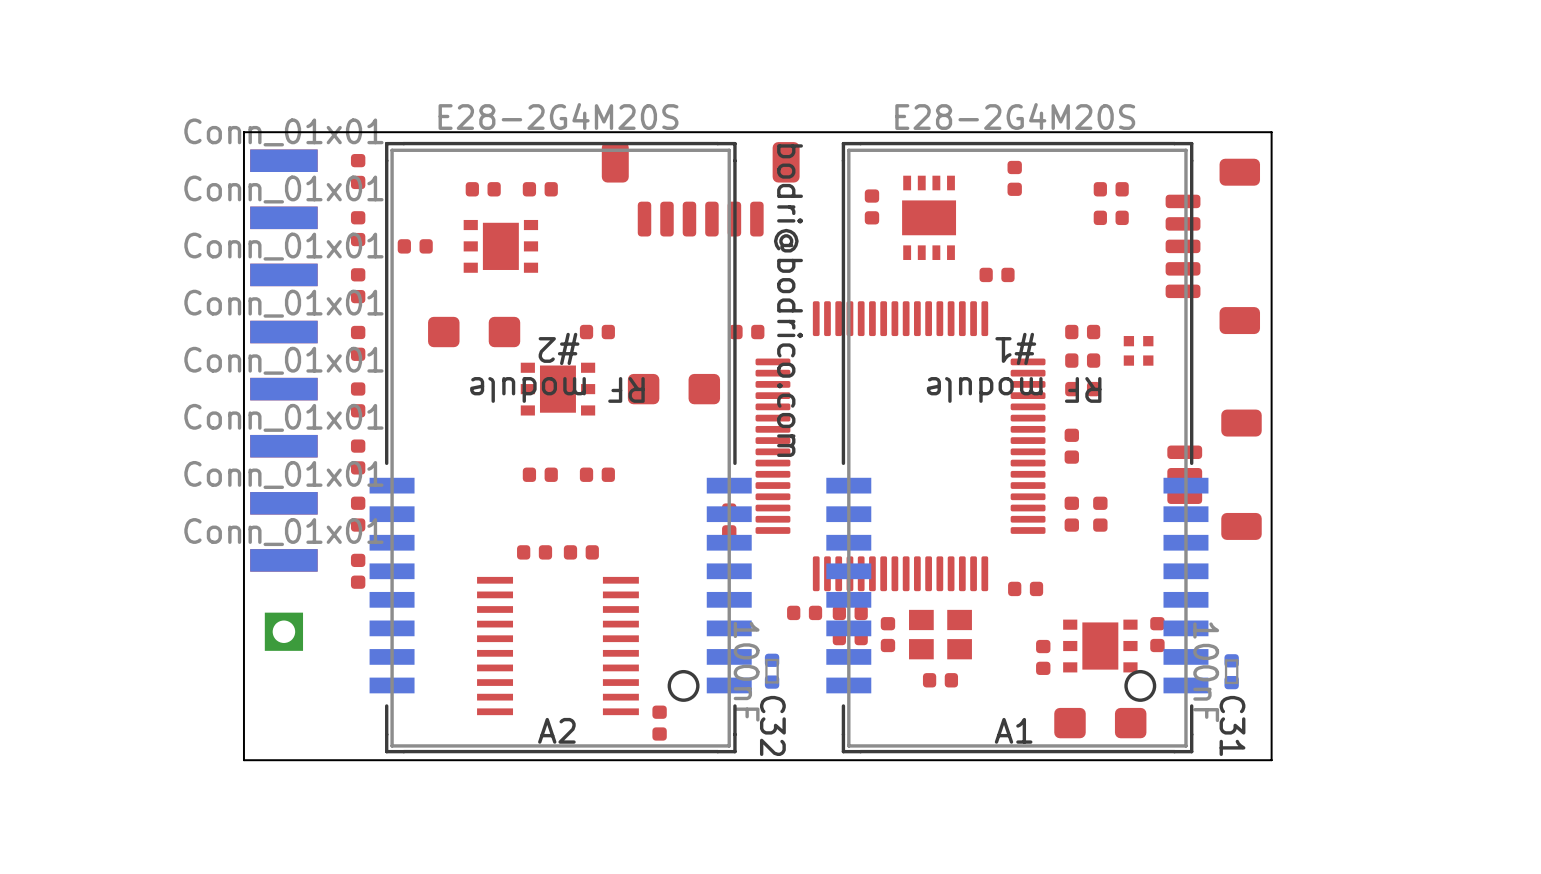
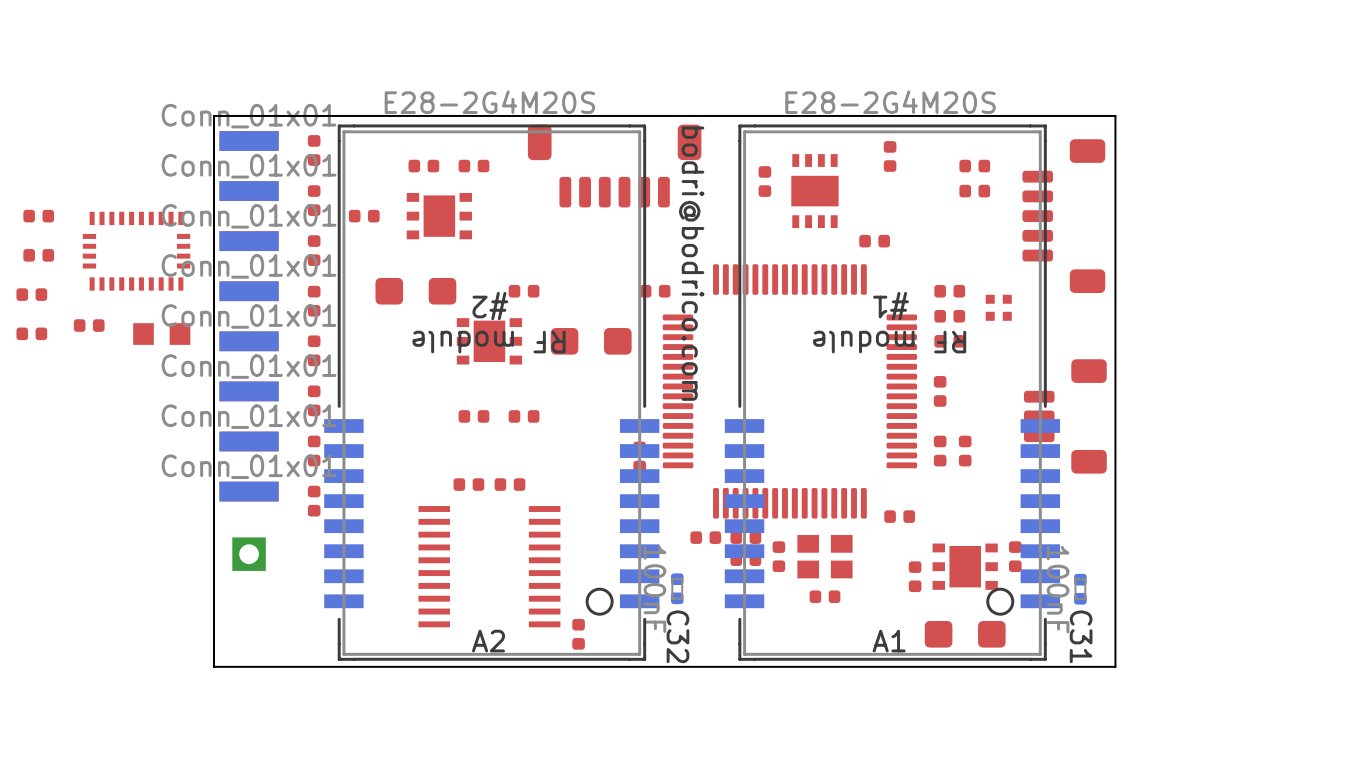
part: none -> (38, 216)
part: none -> (136, 251)
part: none -> (38, 255)
part: none -> (31, 294)
part: none -> (89, 325)
part: none -> (31, 333)
part: none -> (161, 334)

